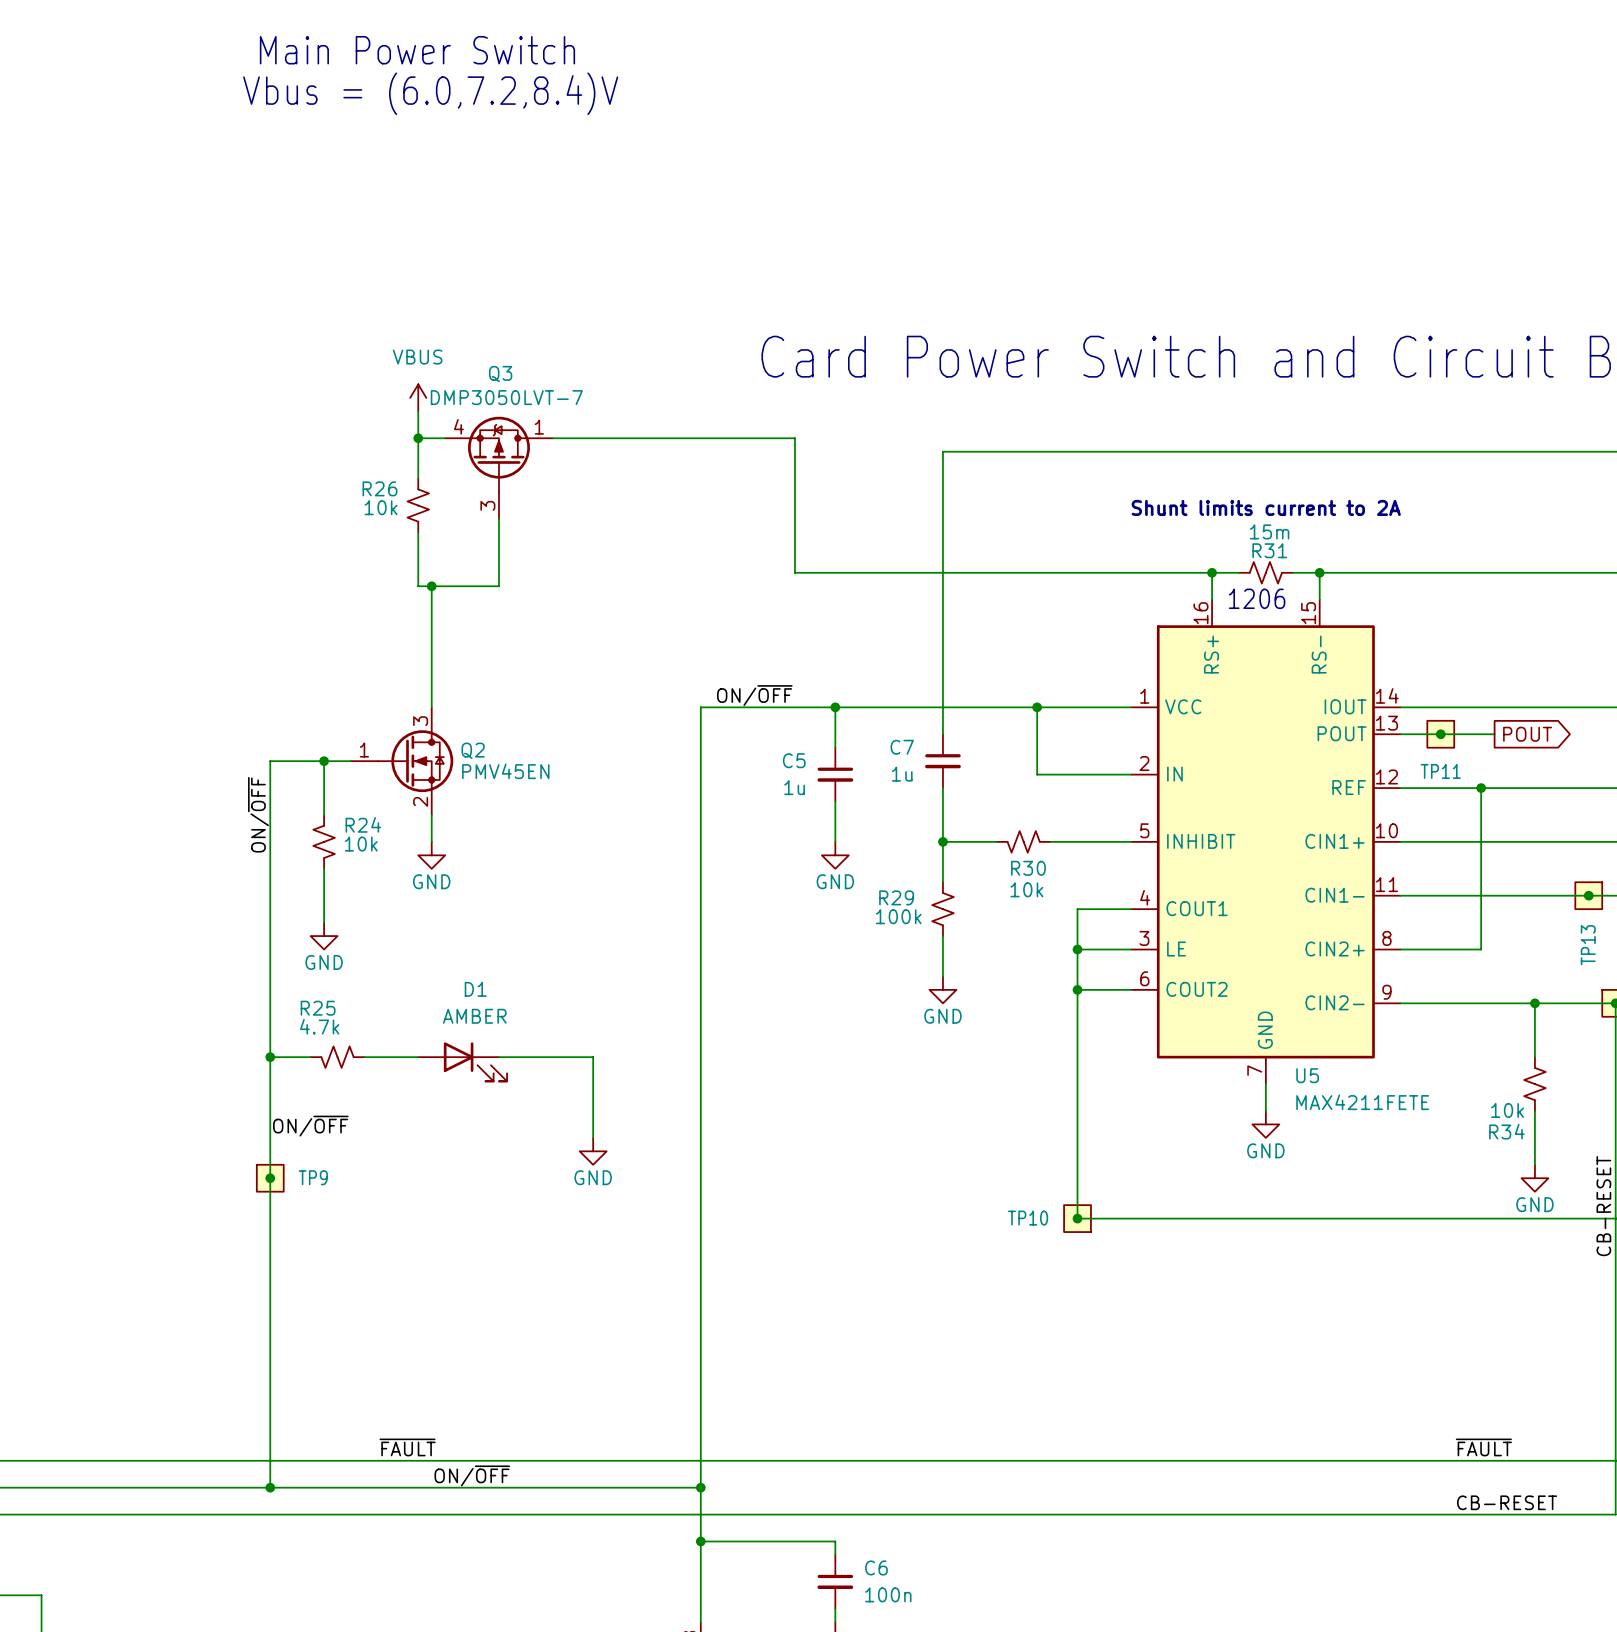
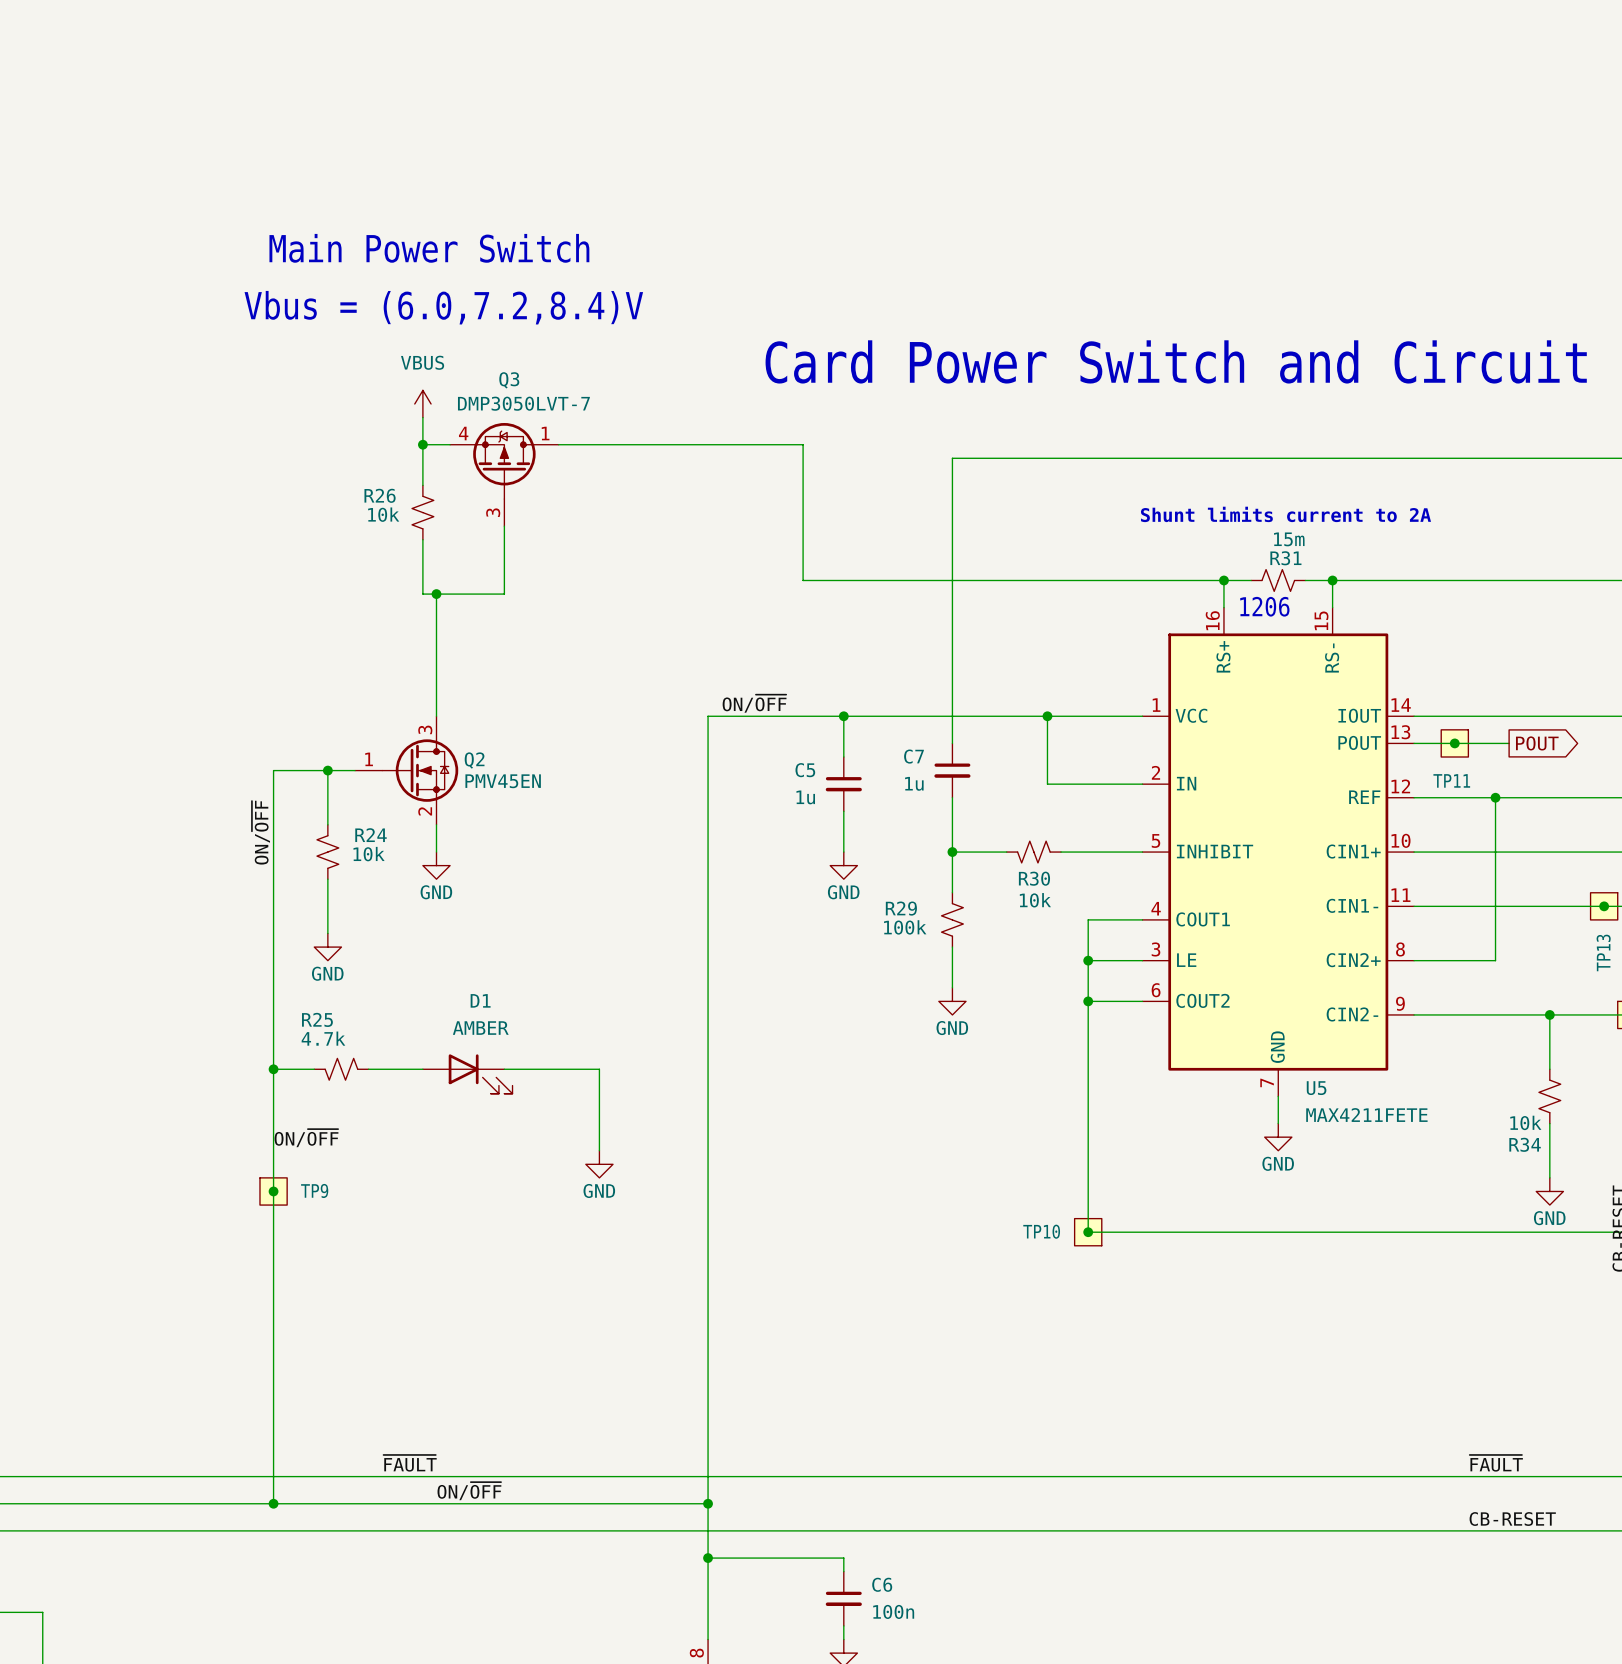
text position: Main Power Switch (417, 50) -> Main Power Switch (429, 248)
text position: Vbus = (6.0,7.2,8.4)V (430, 93) -> Vbus = (6.0,7.2,8.4)V (443, 307)

